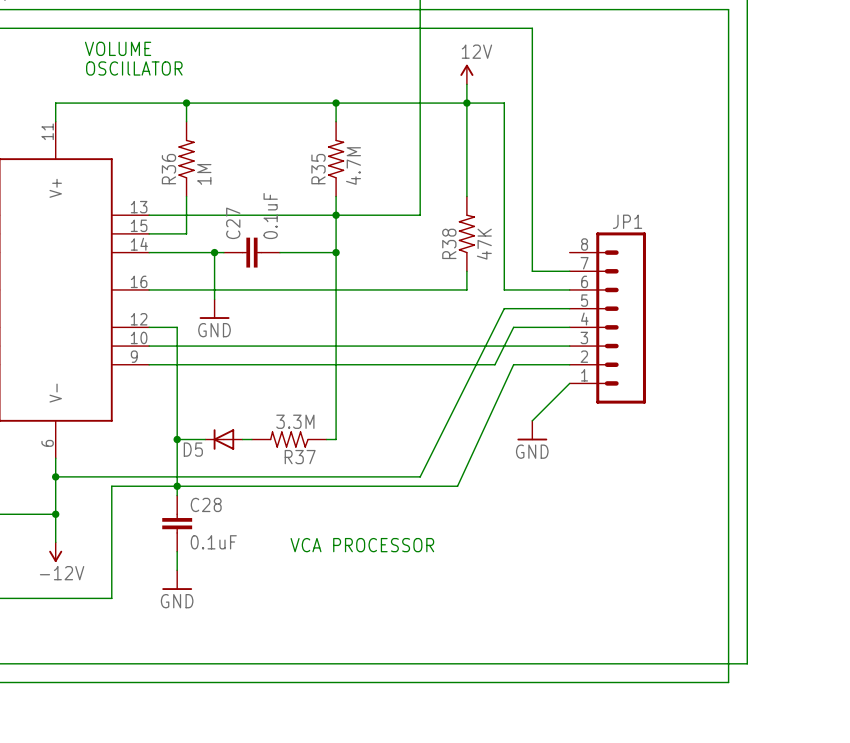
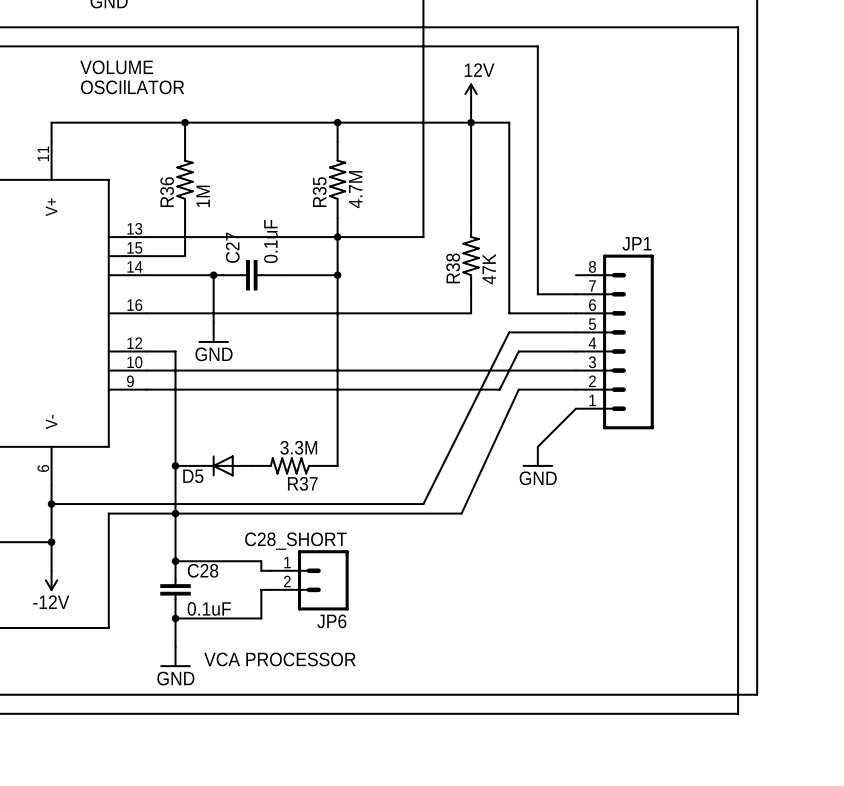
wire: none -> (175, 523) (175, 561) (261, 561) (261, 570) (270, 570)
C28 position: (177, 523) -> (175, 589)
junction: none -> (175, 561)
text position: VCA PROCESSOR (362, 545) -> VCA PROCESSOR (279, 659)
JP6: none -> C28_SHORT (309, 580)
wire: none -> (270, 589) (261, 589) (261, 618) (175, 618) (175, 647)
power symbol position: GND (177, 580) -> GND (175, 657)
junction: none -> (175, 618)

